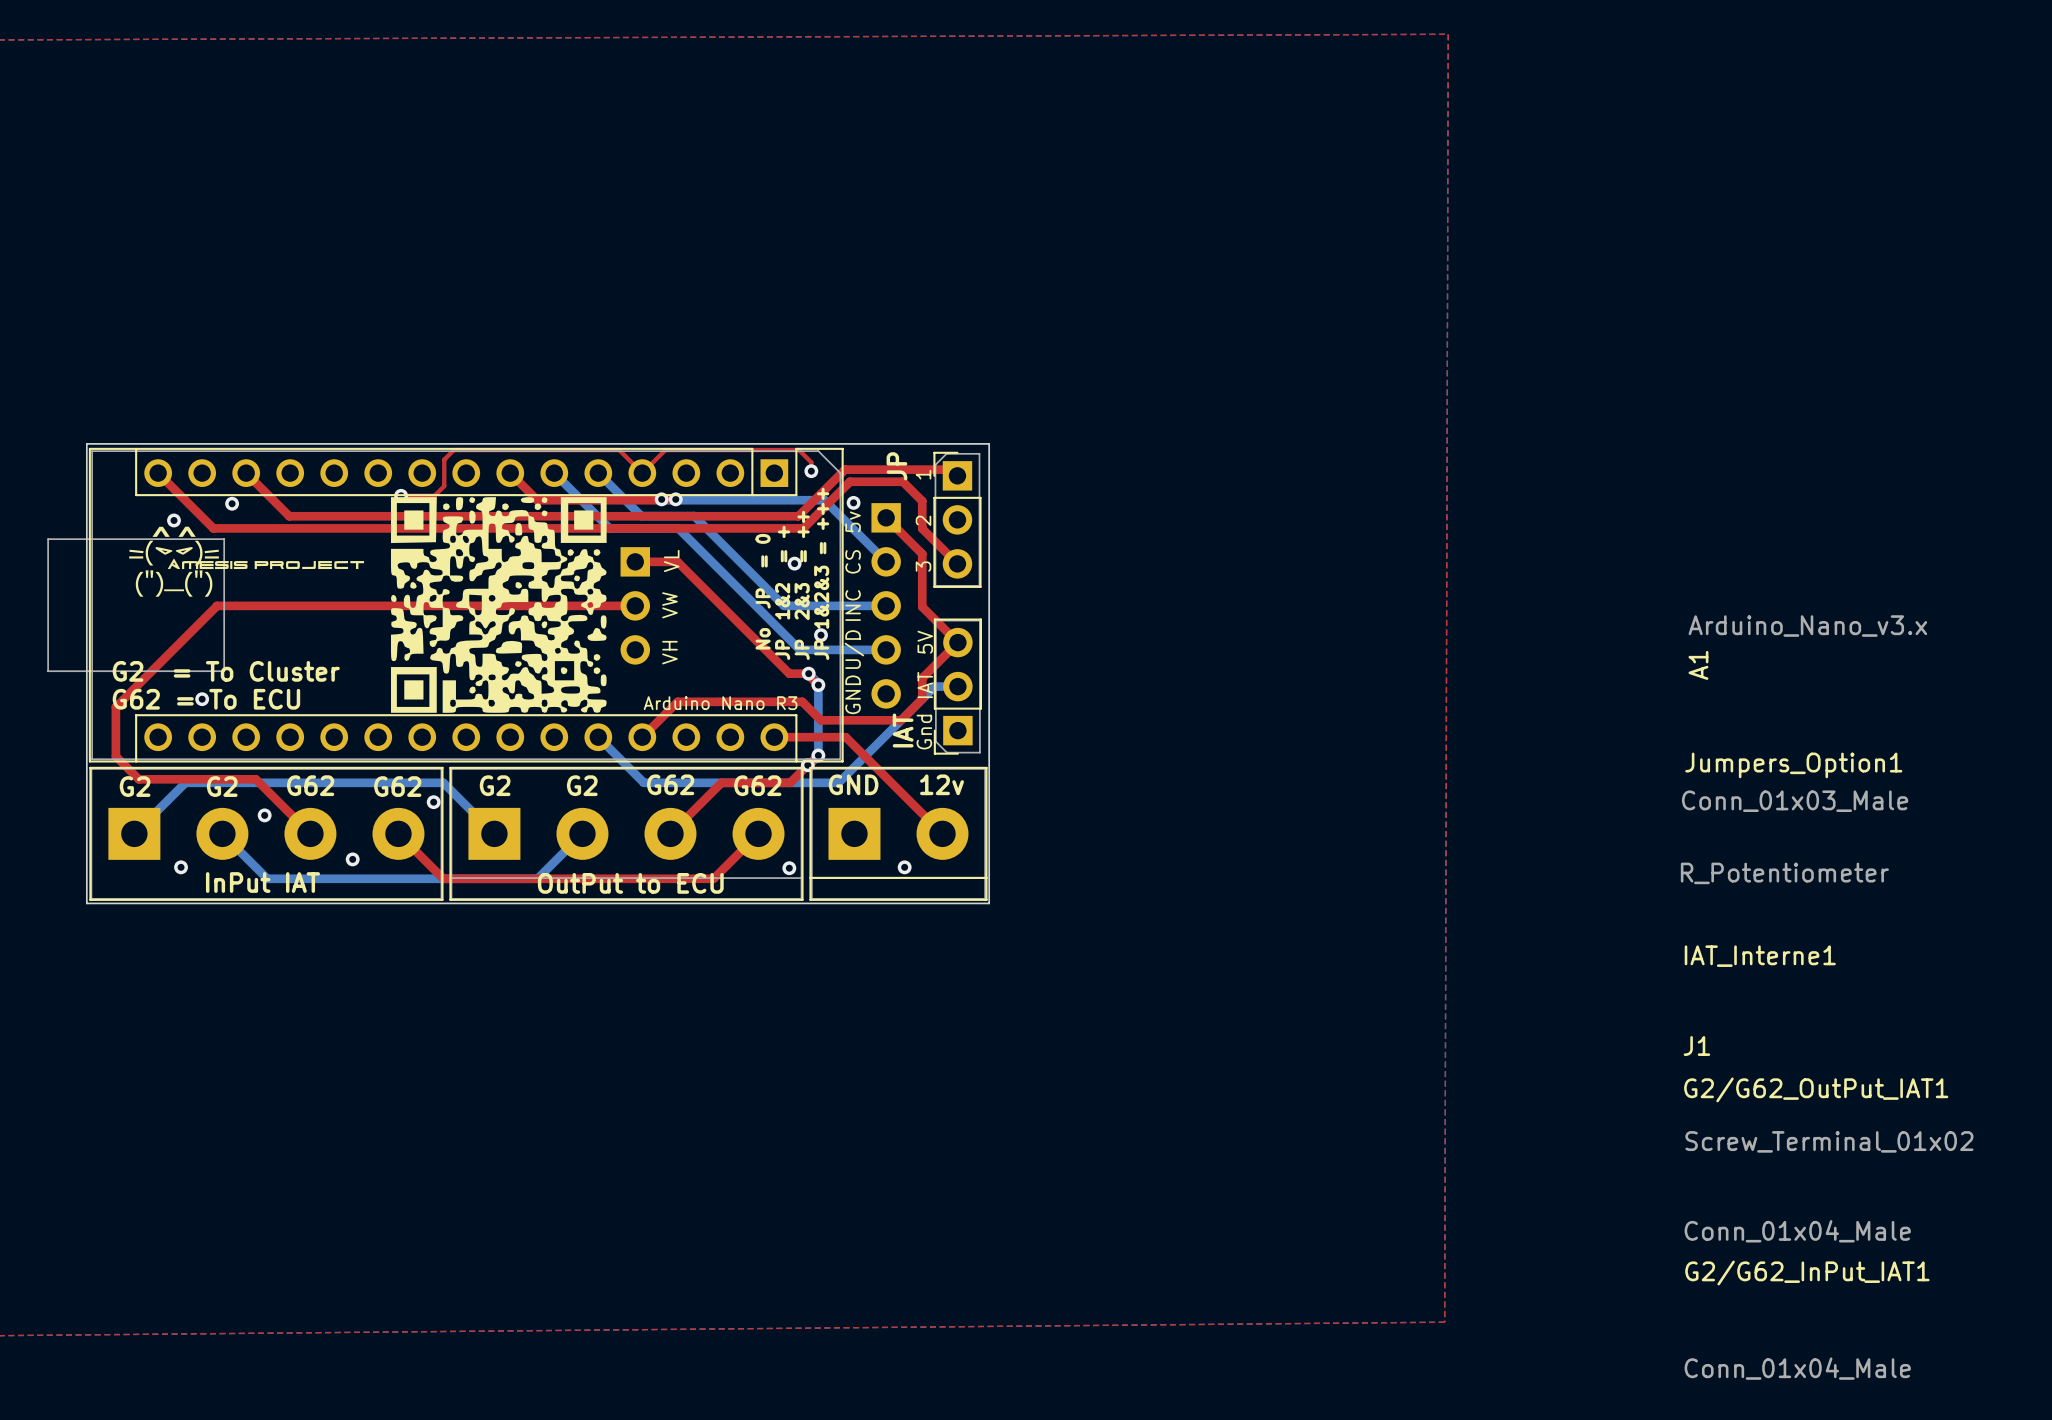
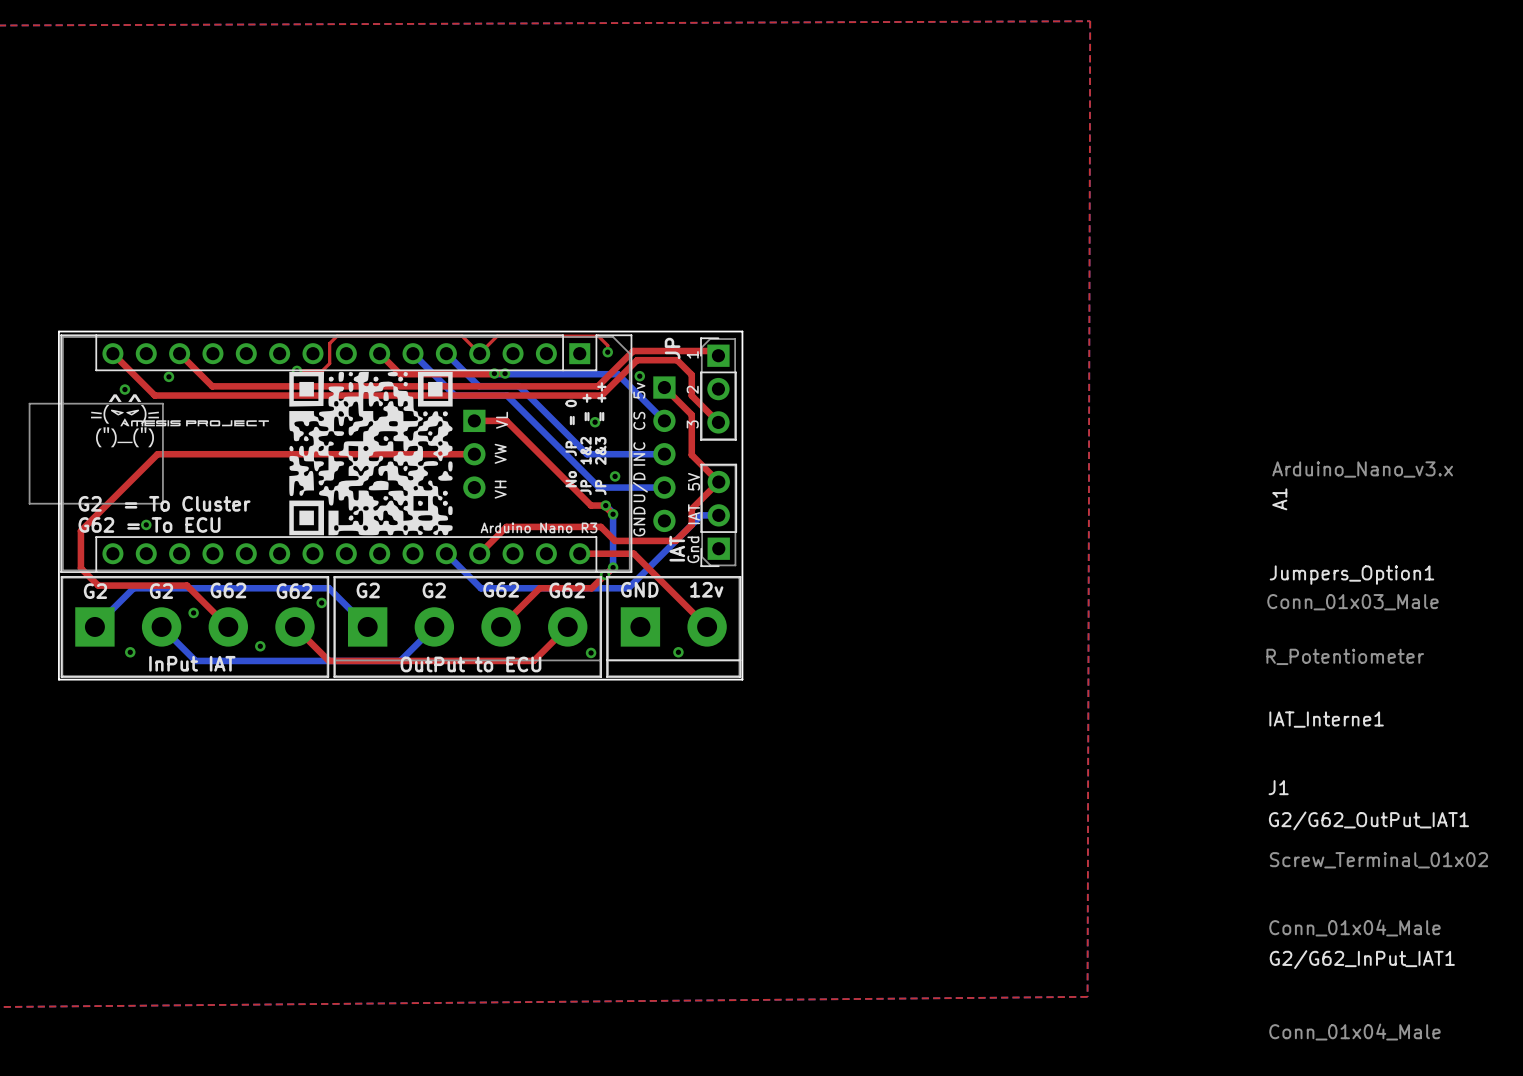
text: JP 1&2&3 = +++ (821, 573) -> none

